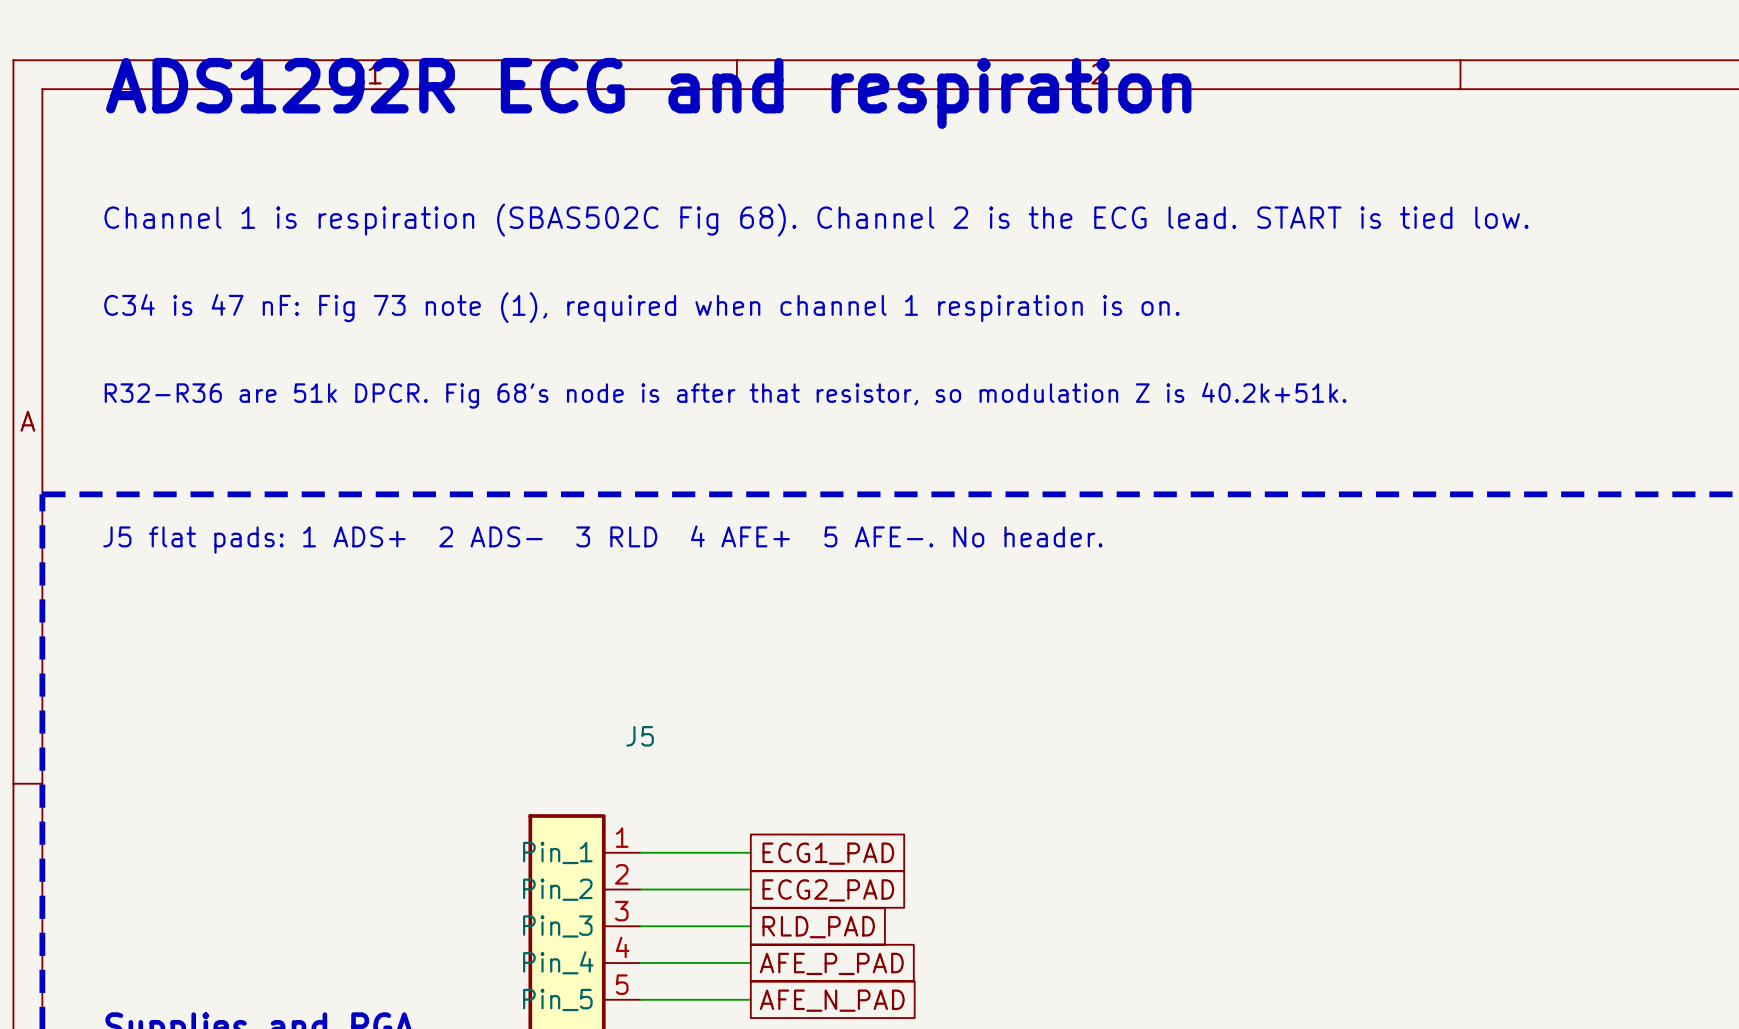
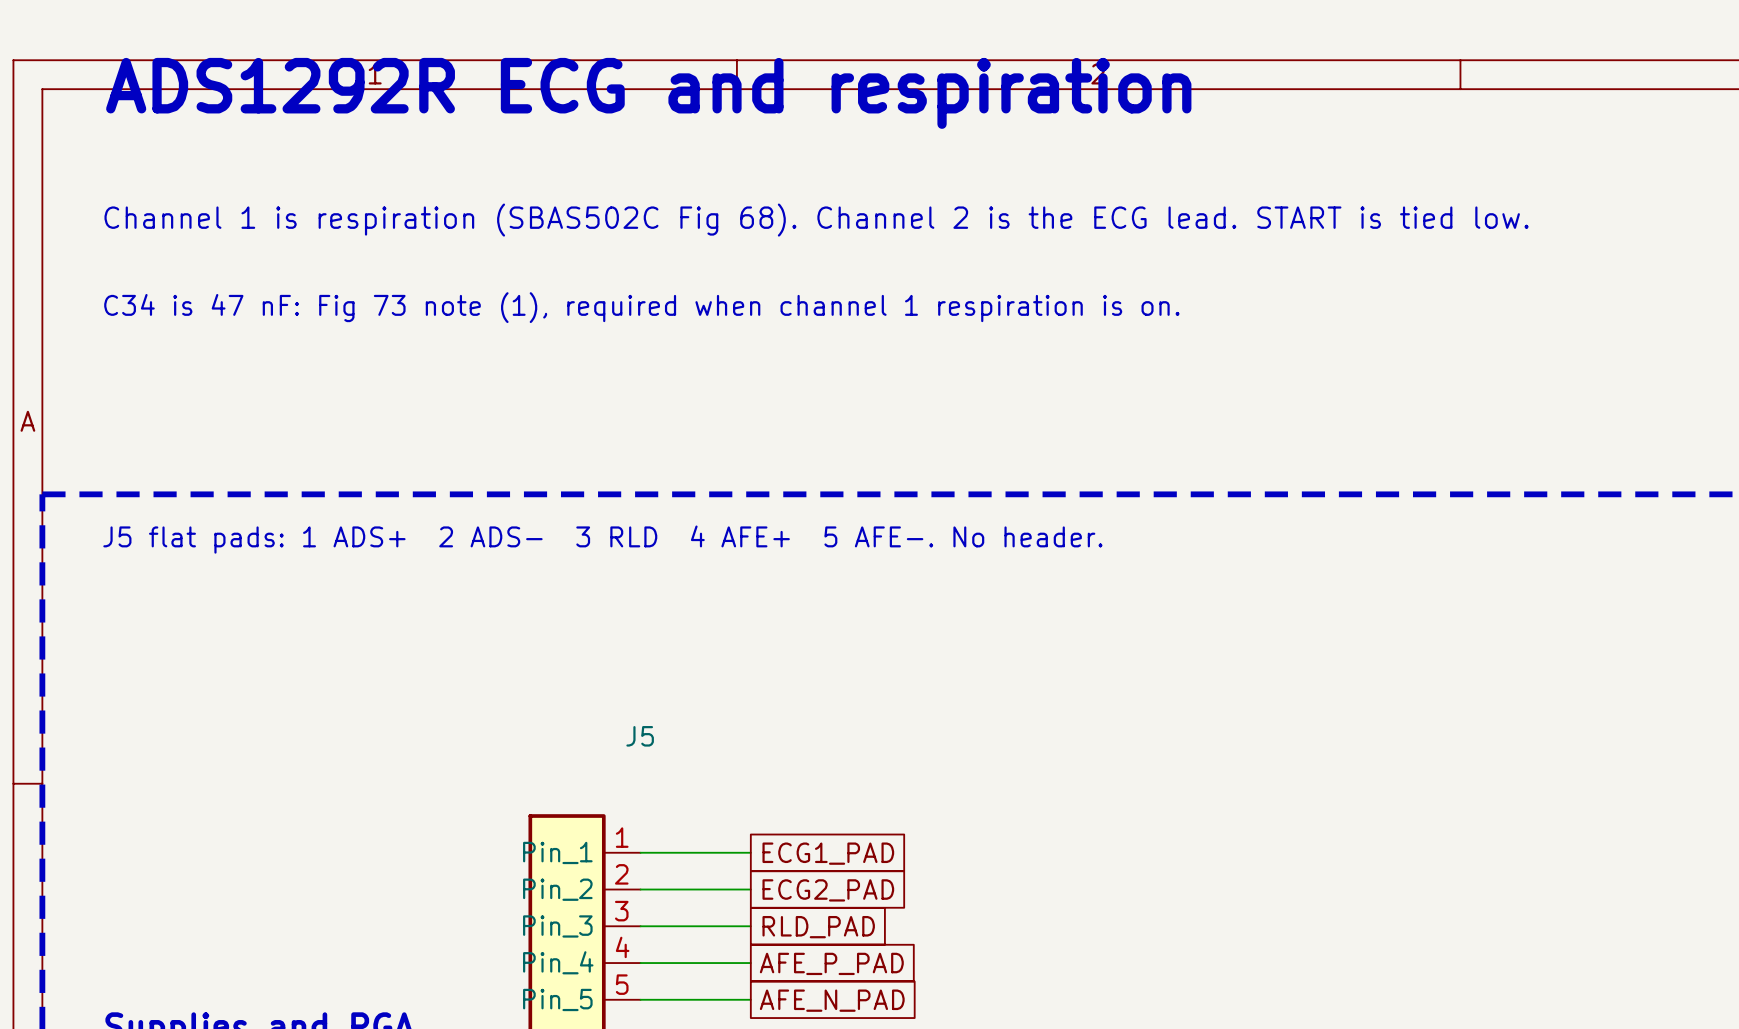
text: R32-R36 are 51k DPCR. Fig 68's node is after that resistor, so modulation Z is 40.2k+51k. (725, 395) -> none

